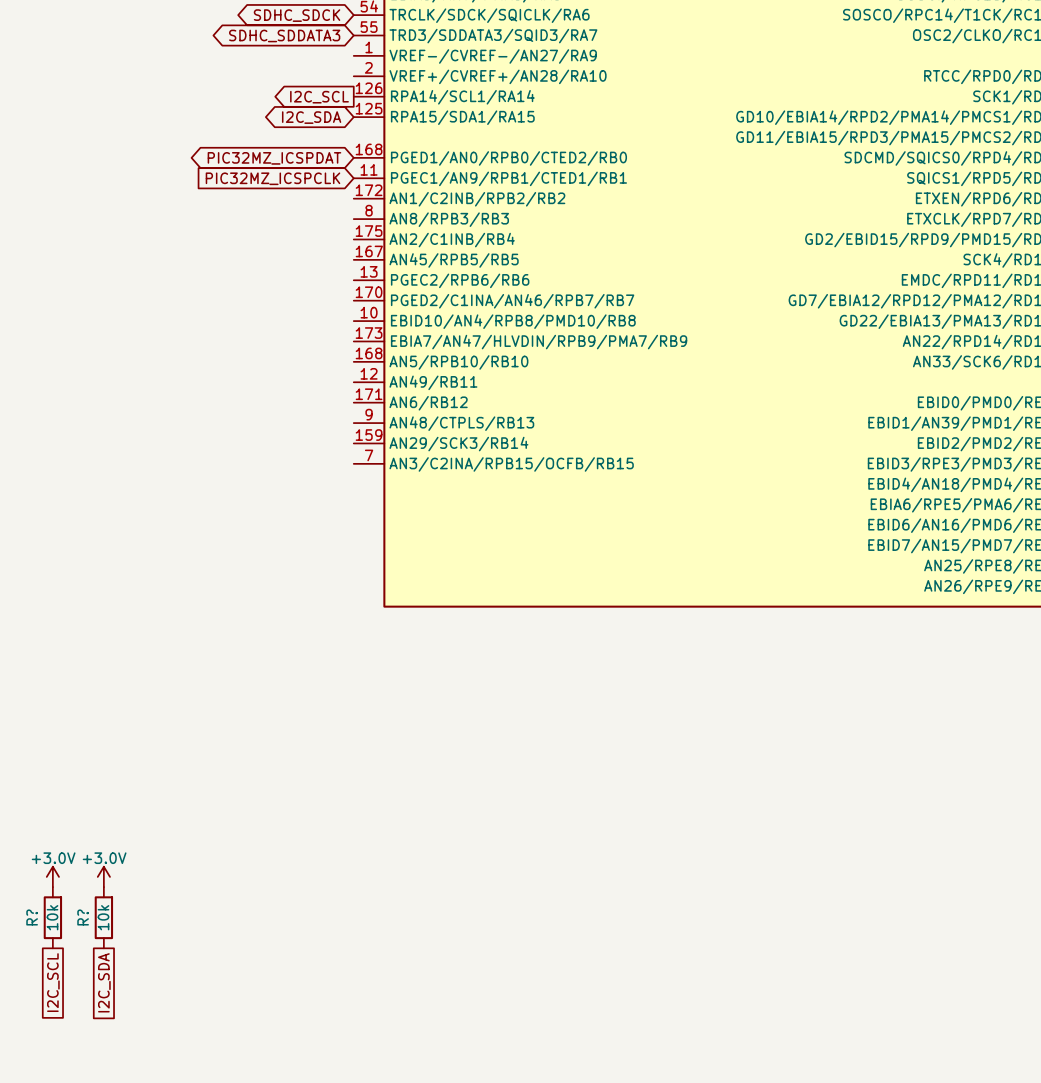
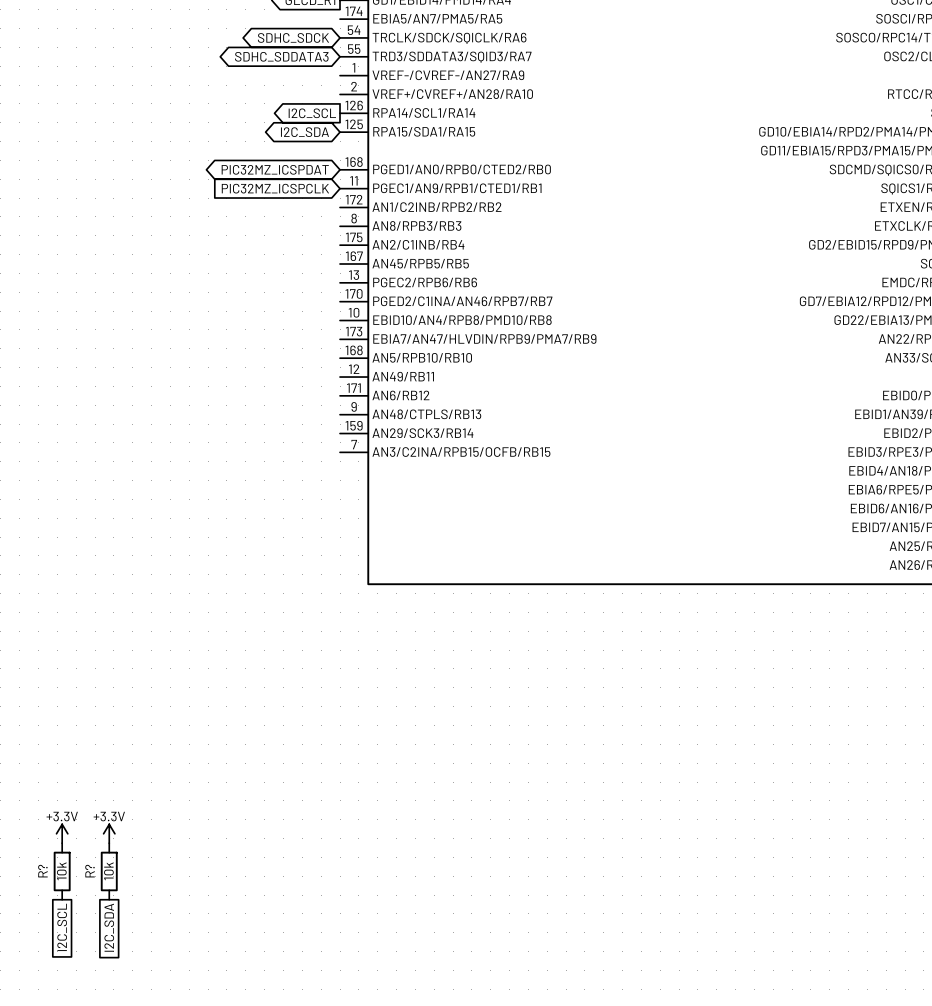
power symbol: +3.0V (52, 876) -> +3.3V (62, 833)
power symbol: +3.0V (103, 876) -> +3.3V (109, 833)

